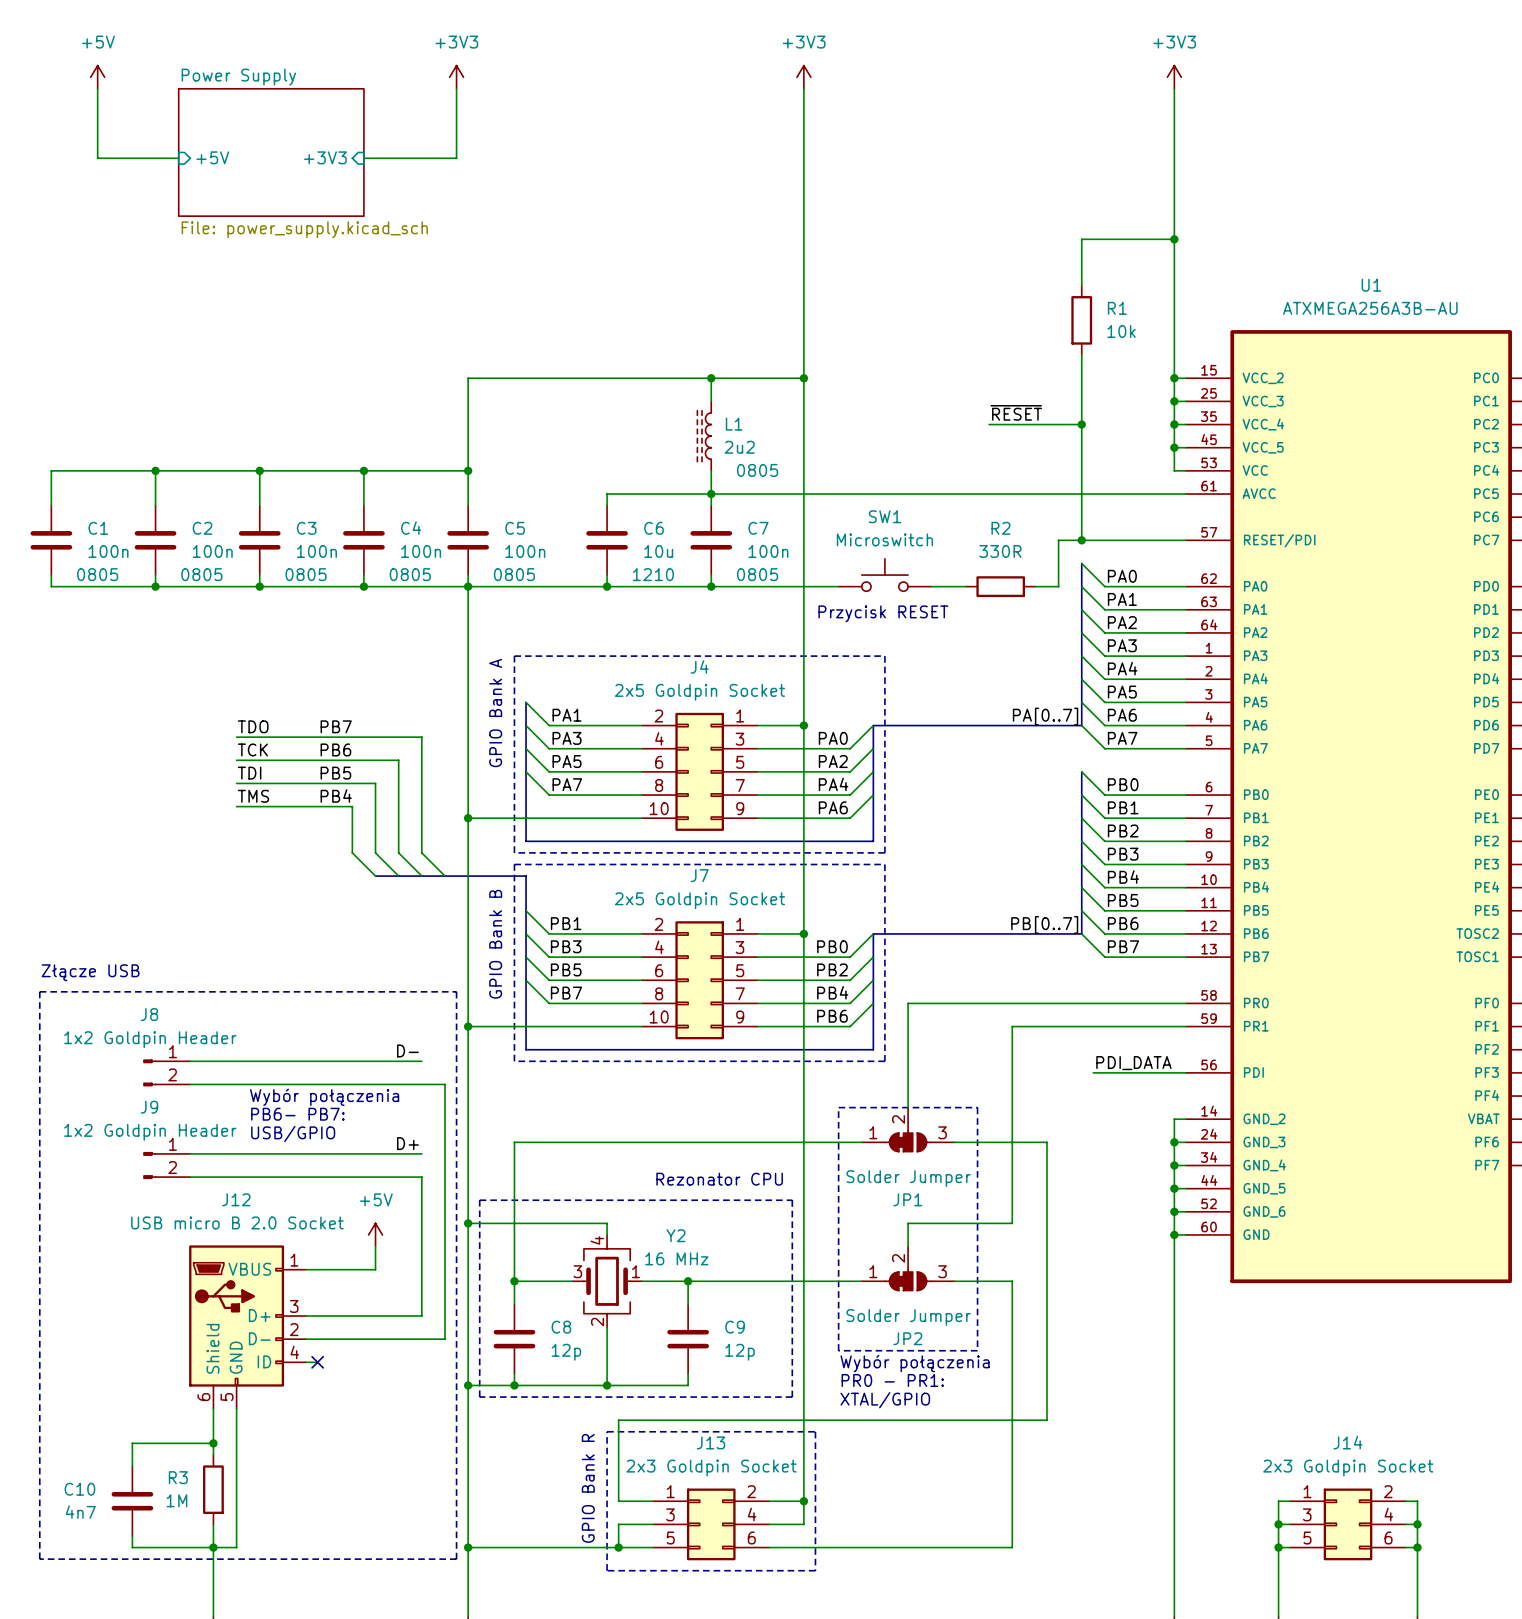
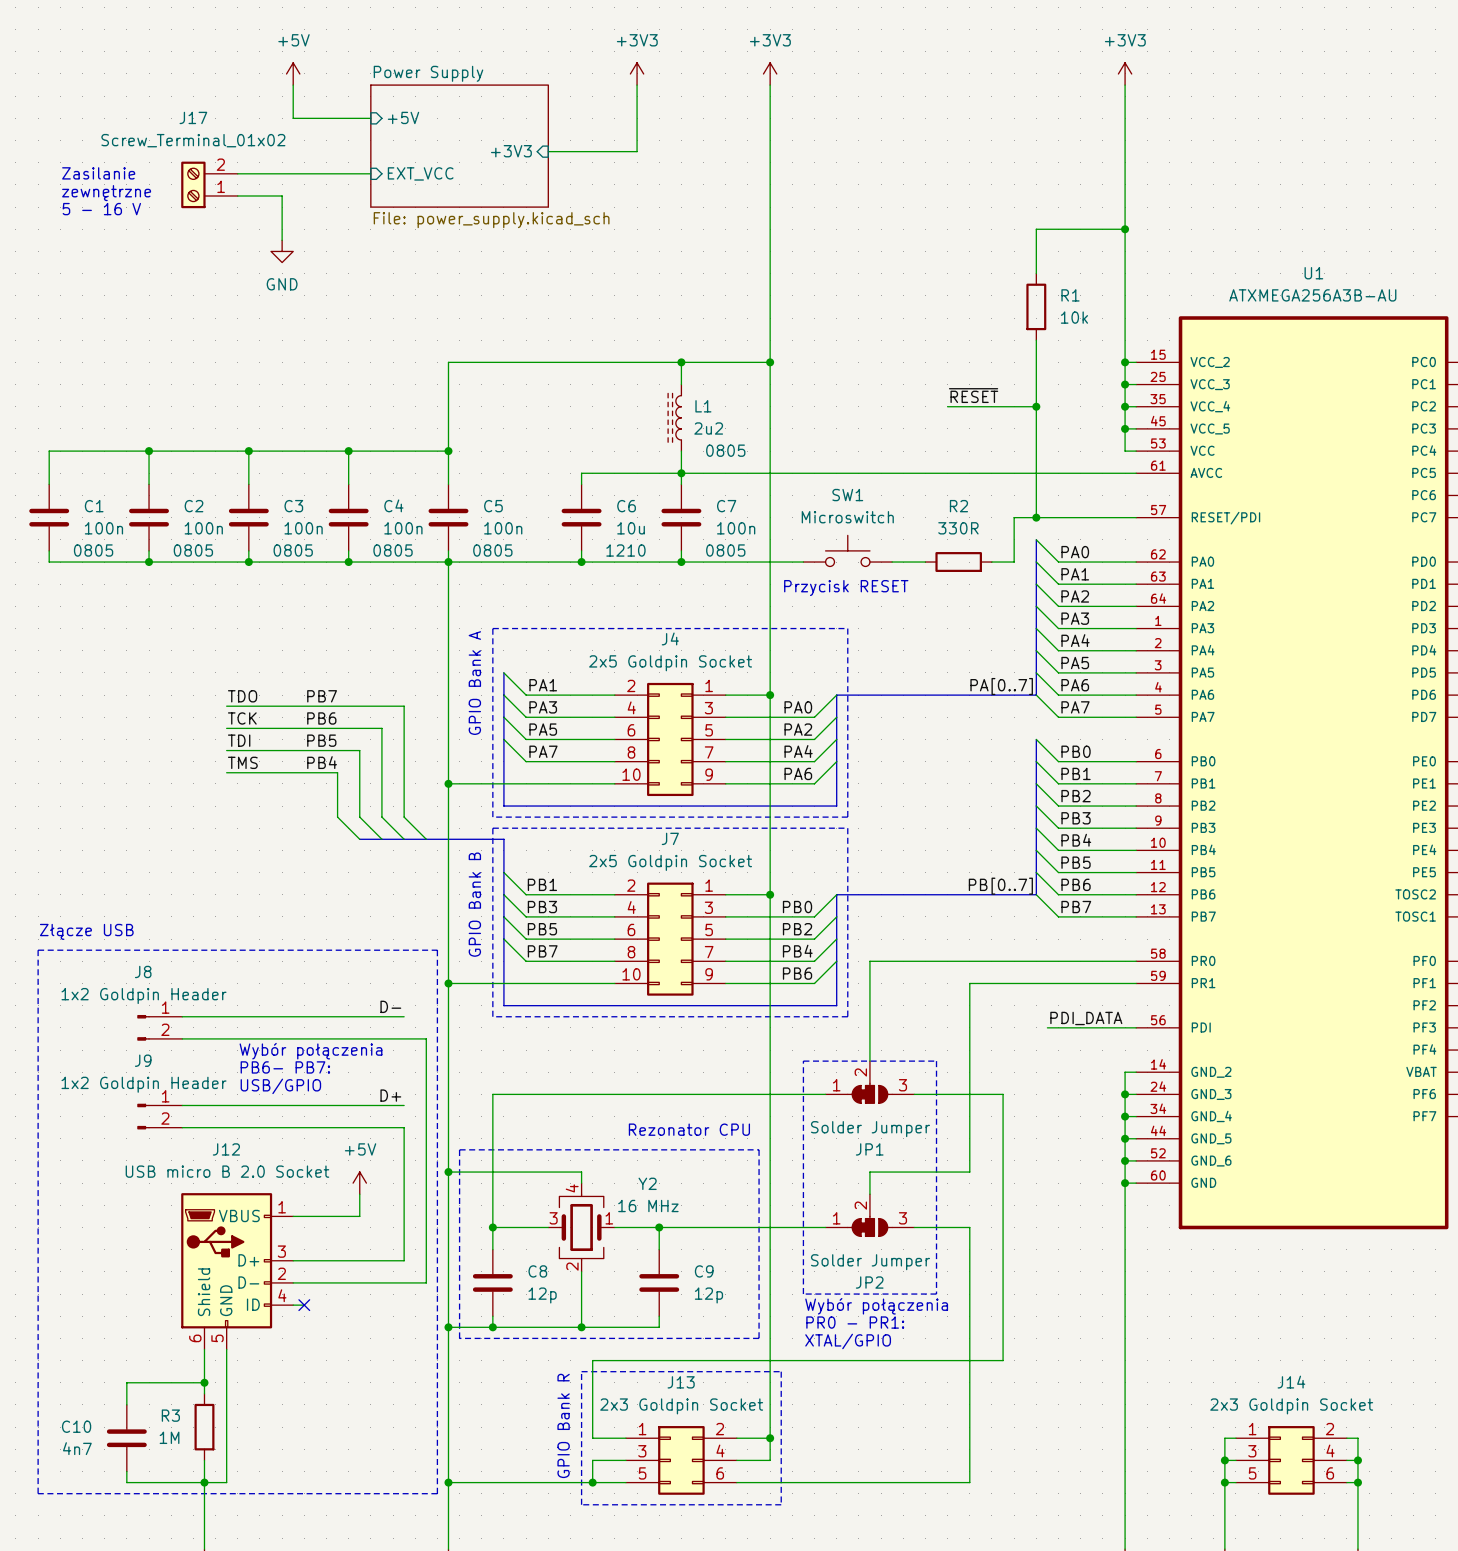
power symbol position: +5V (97, 77) -> +5V (293, 73)
power symbol position: +3V3 (456, 77) -> +3V3 (637, 73)
wire: (97, 88) (97, 158) (178, 158) -> none
wire: none -> (293, 85) (293, 118) (370, 118)
wire: (456, 88) (456, 158) (363, 158) -> (637, 85) (637, 151) (548, 151)
sheet Power Supply position: (271, 152) -> (459, 146)
sheet pin position: +5V (212, 157) -> +5V (403, 117)
sheet pin position: +3V3 (325, 157) -> +3V3 (511, 151)
text: none -> Zasilanie (98, 173)
wire: none -> (237, 173) (370, 173)
sheet pin: none -> EXT_VCC (420, 173)
J17: none -> Screw_Terminal_01x02 (209, 184)
text: none -> zewnętrzne (106, 193)
wire: none -> (237, 195) (282, 195) (282, 240)
text: none -> 5 - 16 V (101, 209)
power symbol: none -> GND (282, 251)

